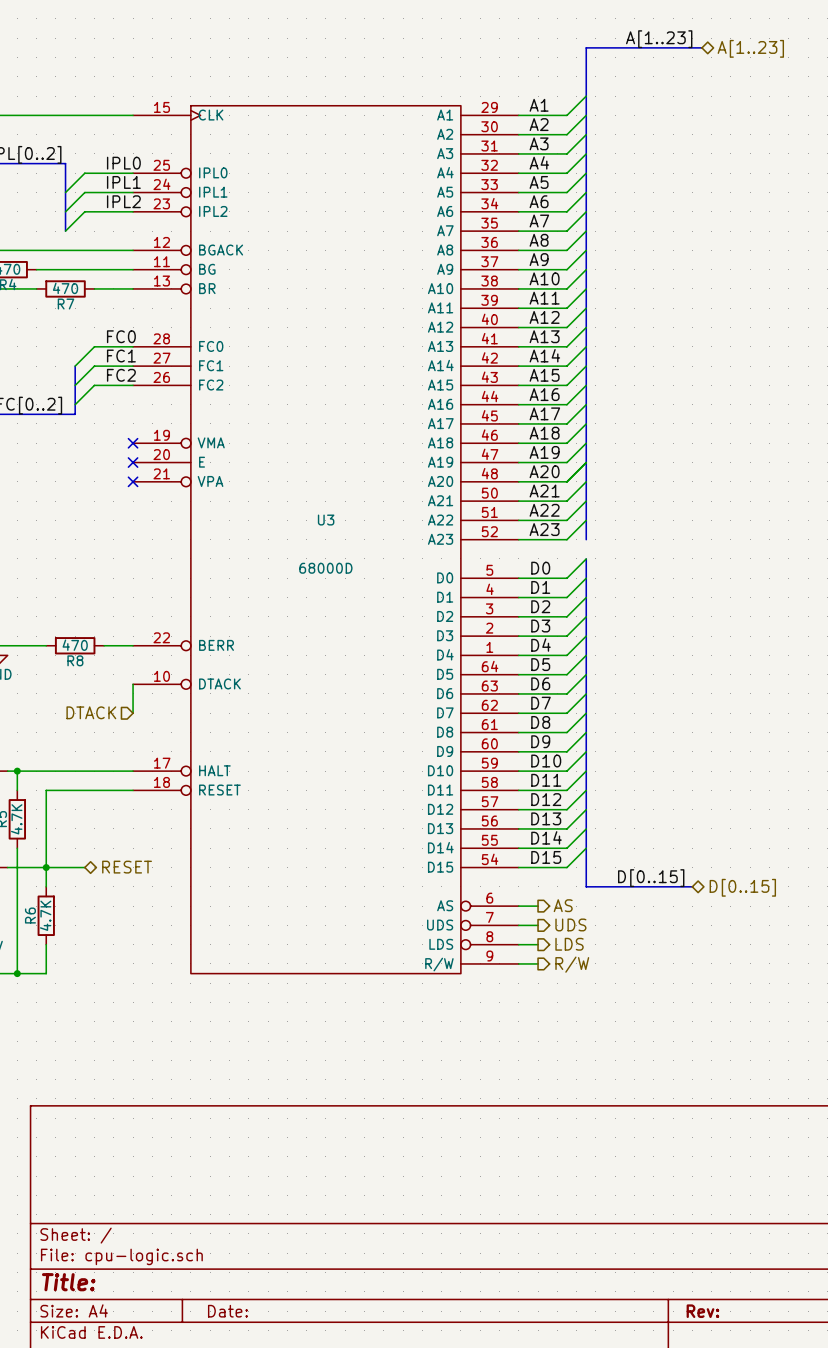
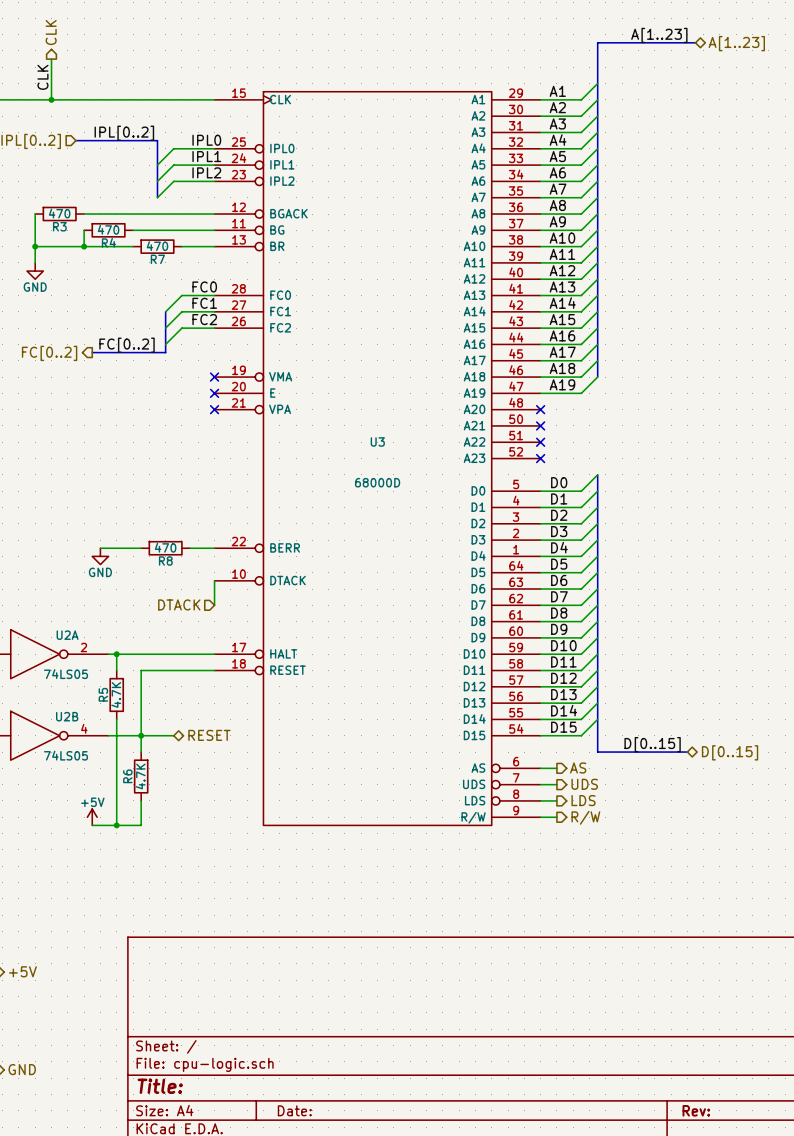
bus: (586, 443) (586, 539) -> none
wire: (586, 462) (566, 481) (518, 481) -> none
label: A20 (544, 471) -> none
no-connect mark: none -> (540, 409)
wire: (586, 481) (566, 501) (518, 501) -> none
label: A21 (544, 491) -> none
no-connect mark: none -> (540, 425)
wire: (586, 501) (566, 520) (518, 520) -> none
label: A22 (544, 510) -> none
no-connect mark: none -> (540, 442)
wire: (586, 520) (566, 539) (518, 539) -> none
label: A23 (544, 529) -> none
no-connect mark: none -> (540, 458)

